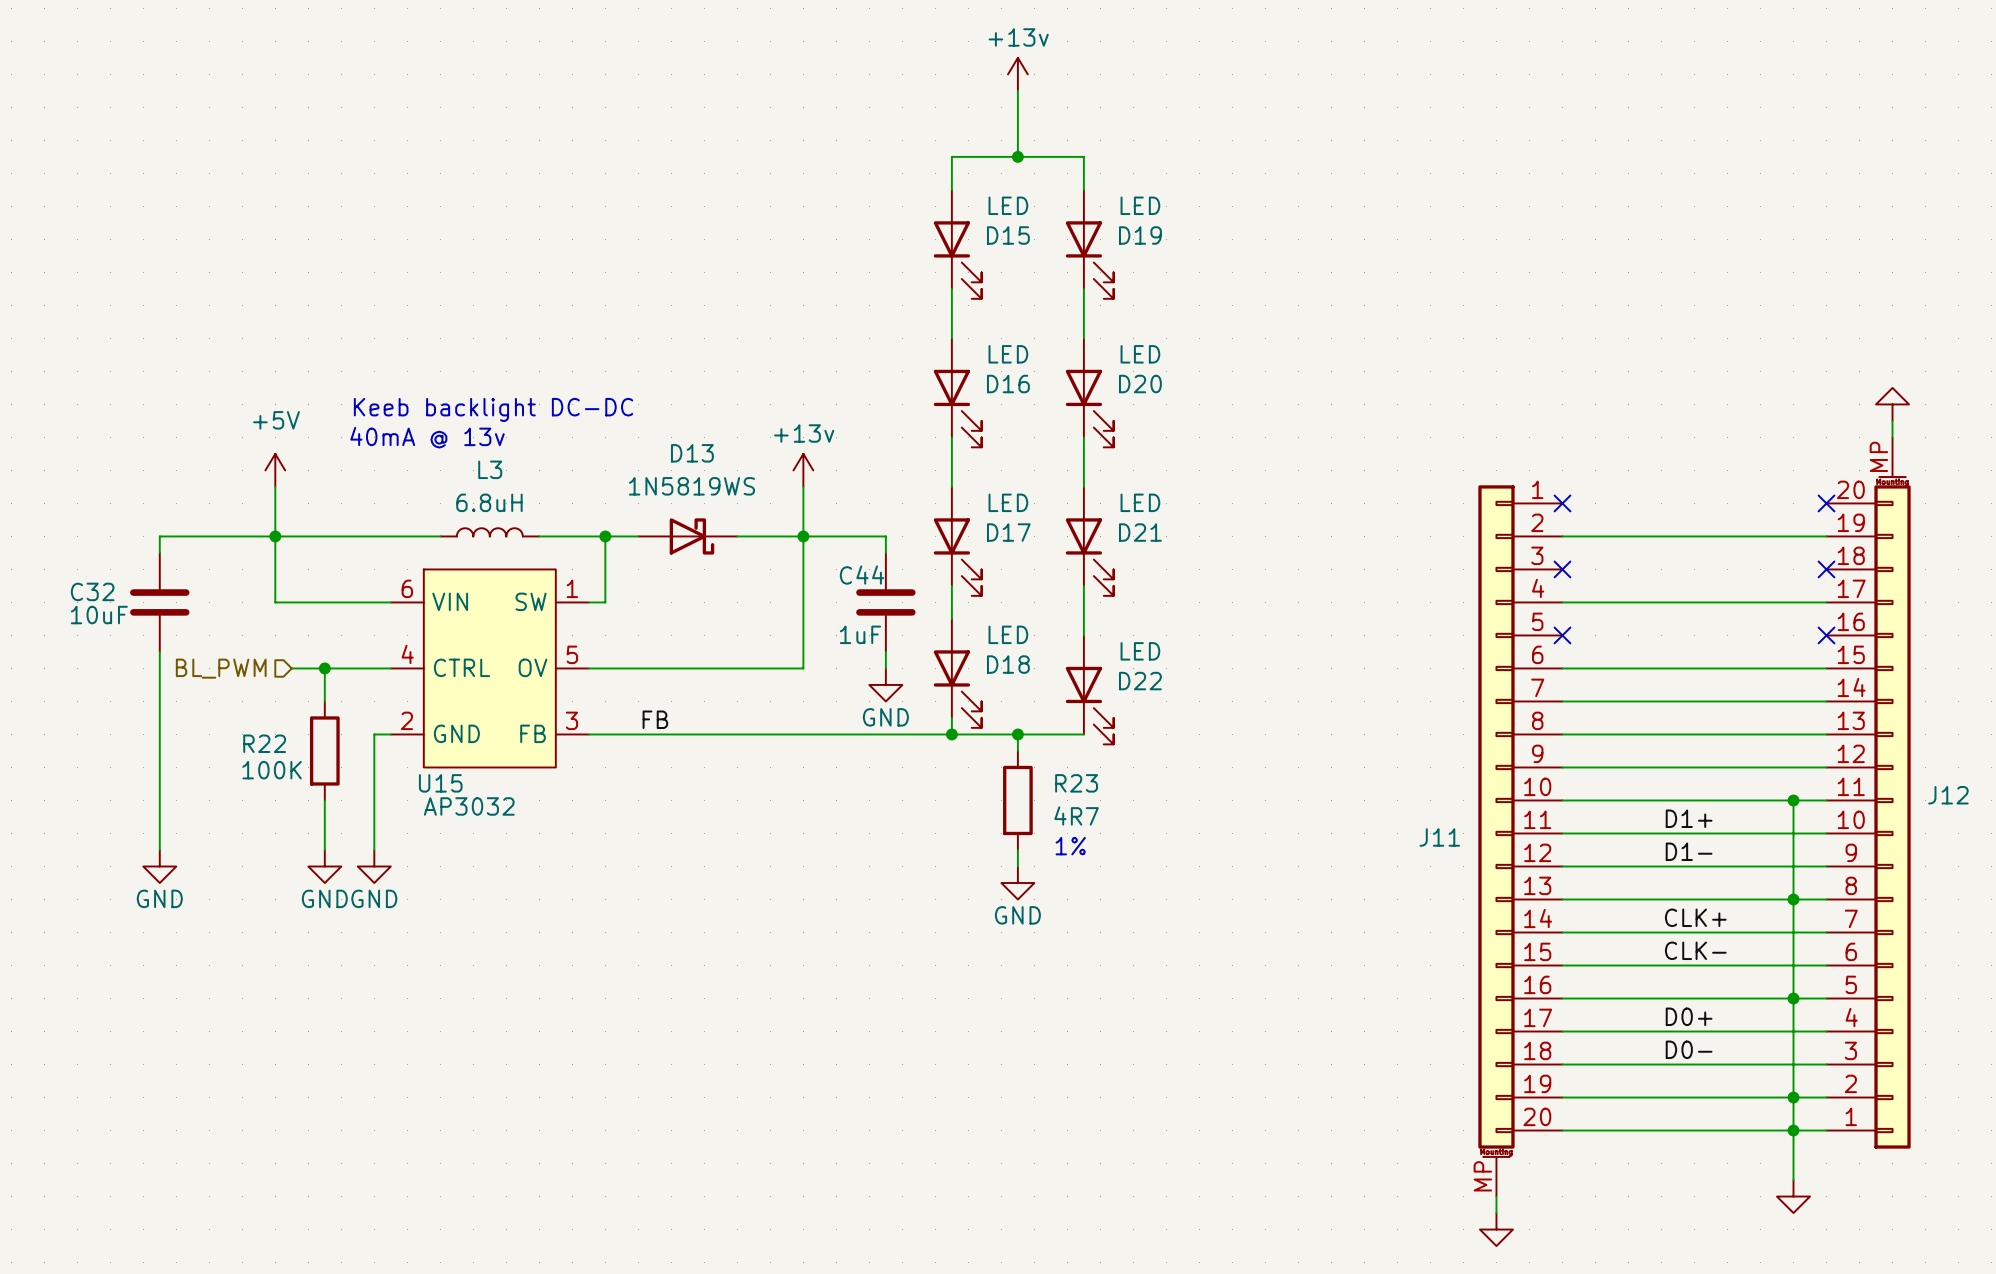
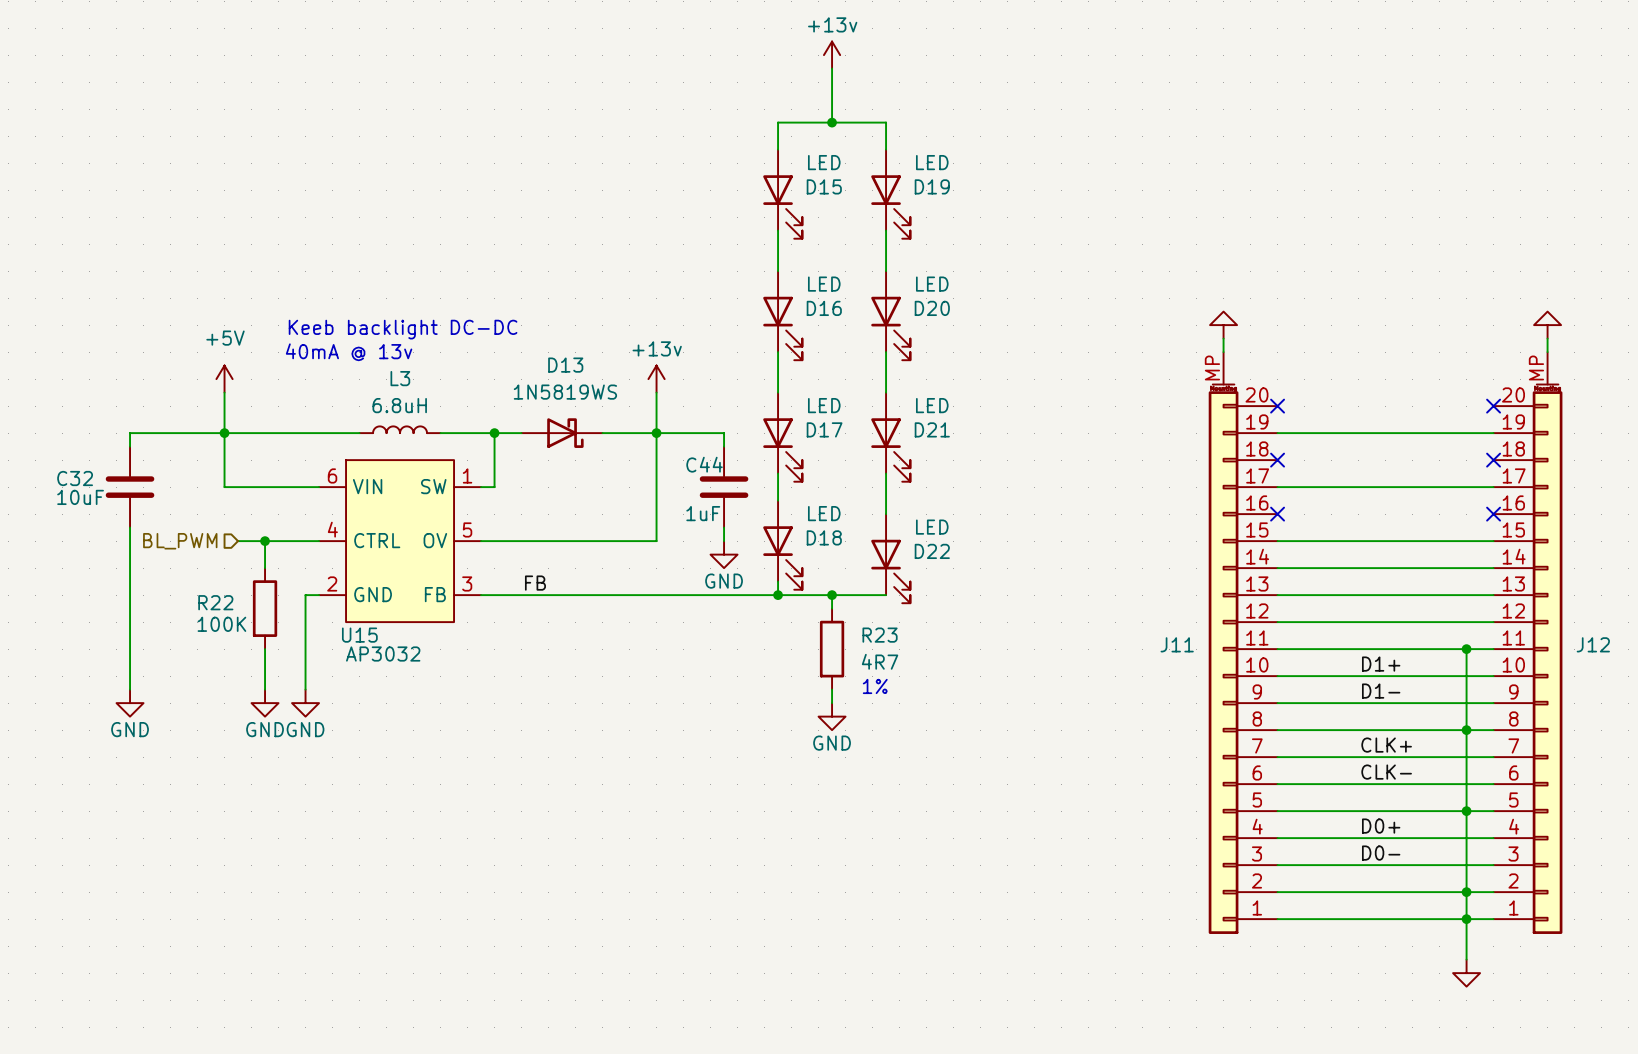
power symbol: none -> (1223, 325)
wire: none -> (1223, 338) (1223, 352)
J11 flip: as is (1496, 821) -> up-down (1223, 658)
wire: (1496, 1196) (1496, 1213) -> none
power symbol: (1496, 1229) -> none

